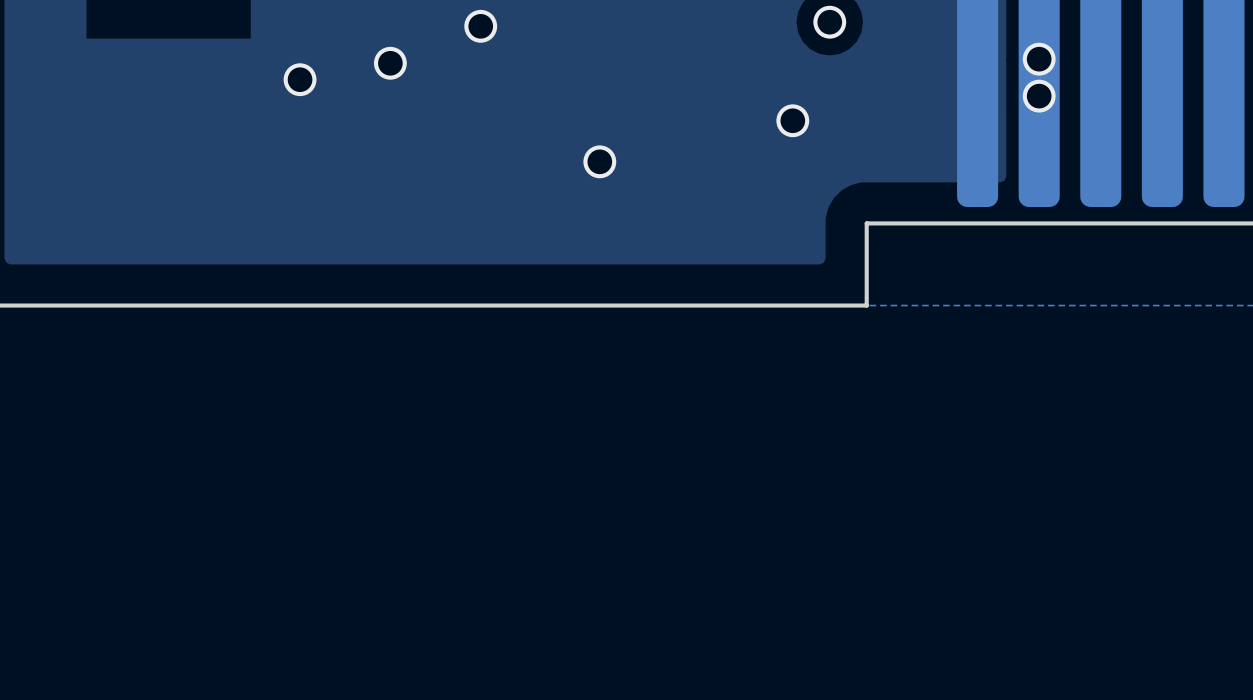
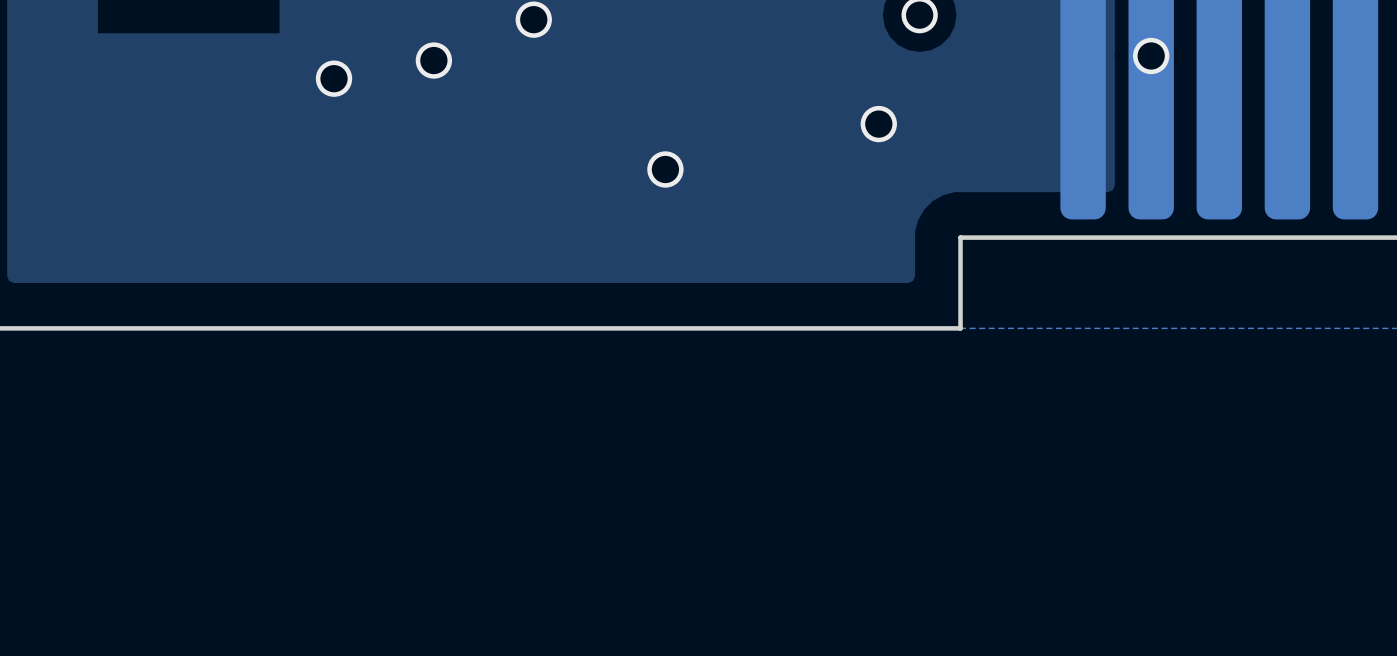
via: (1039, 96) -> none

